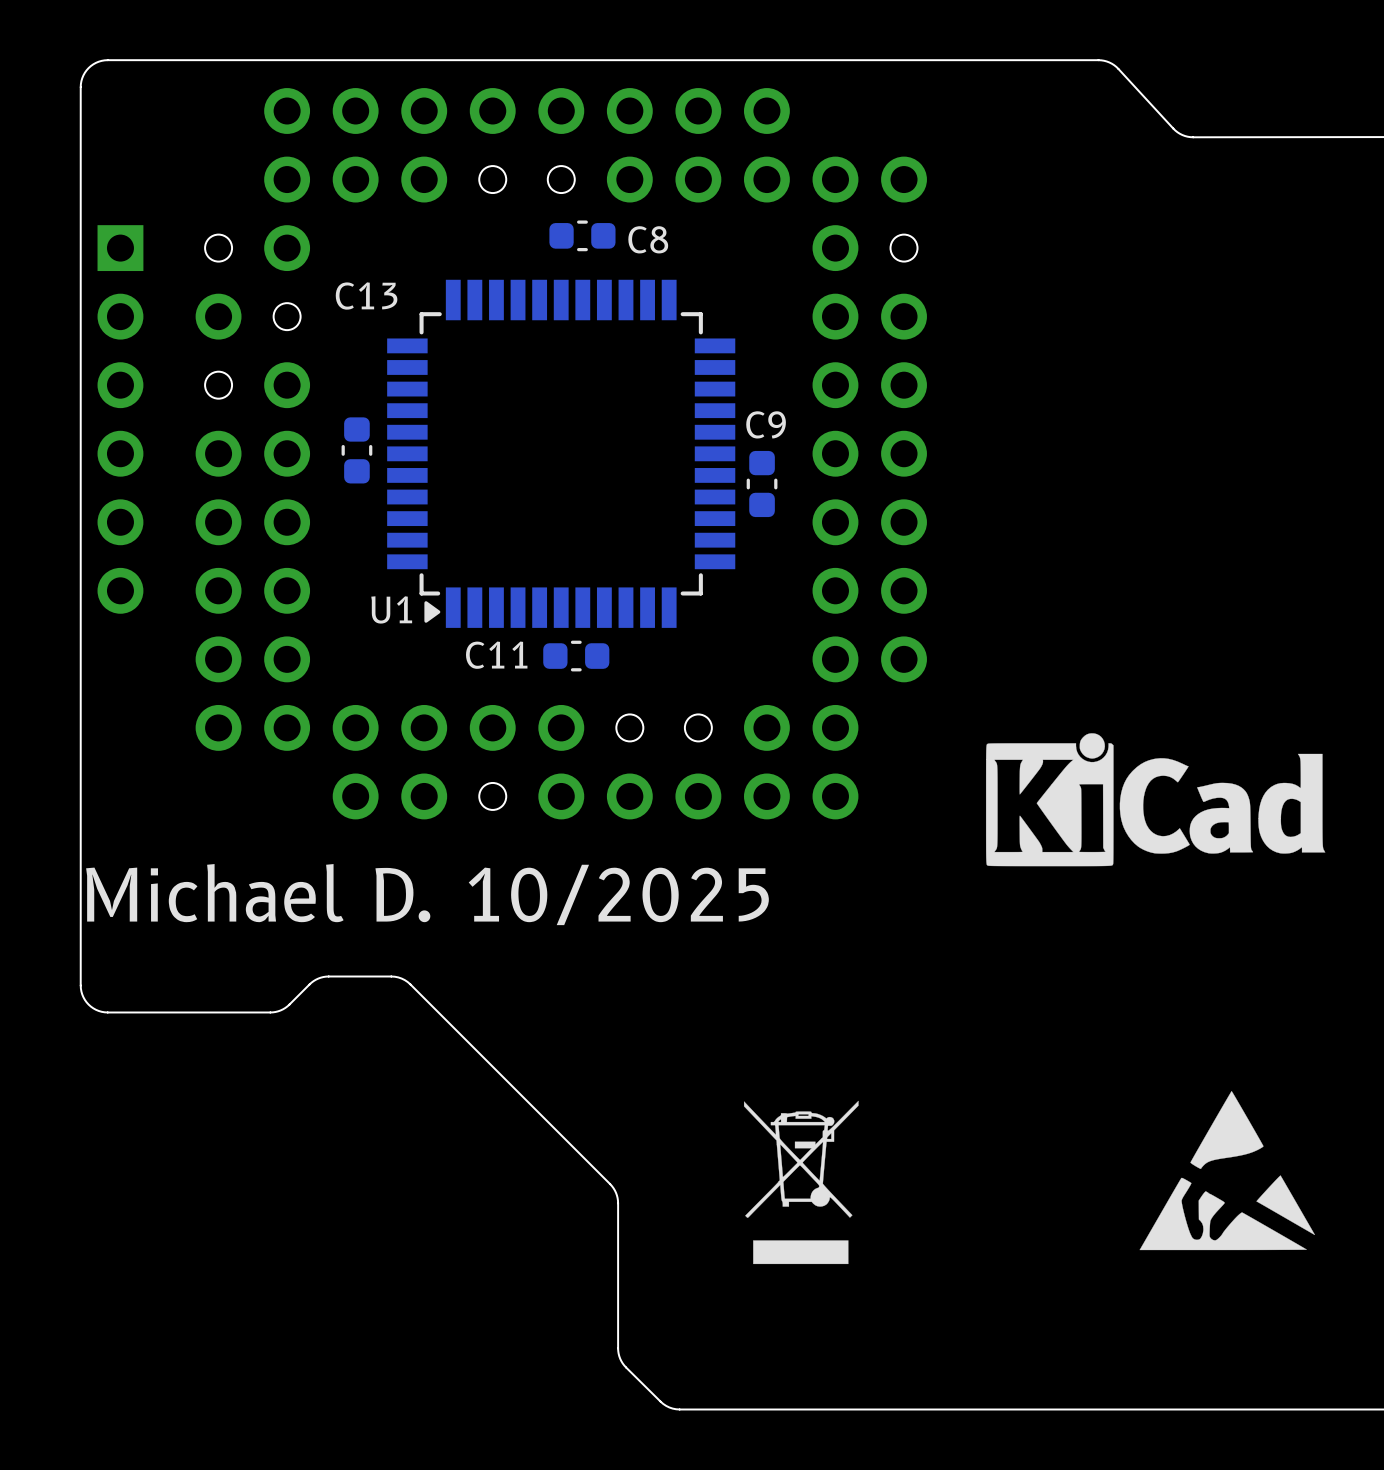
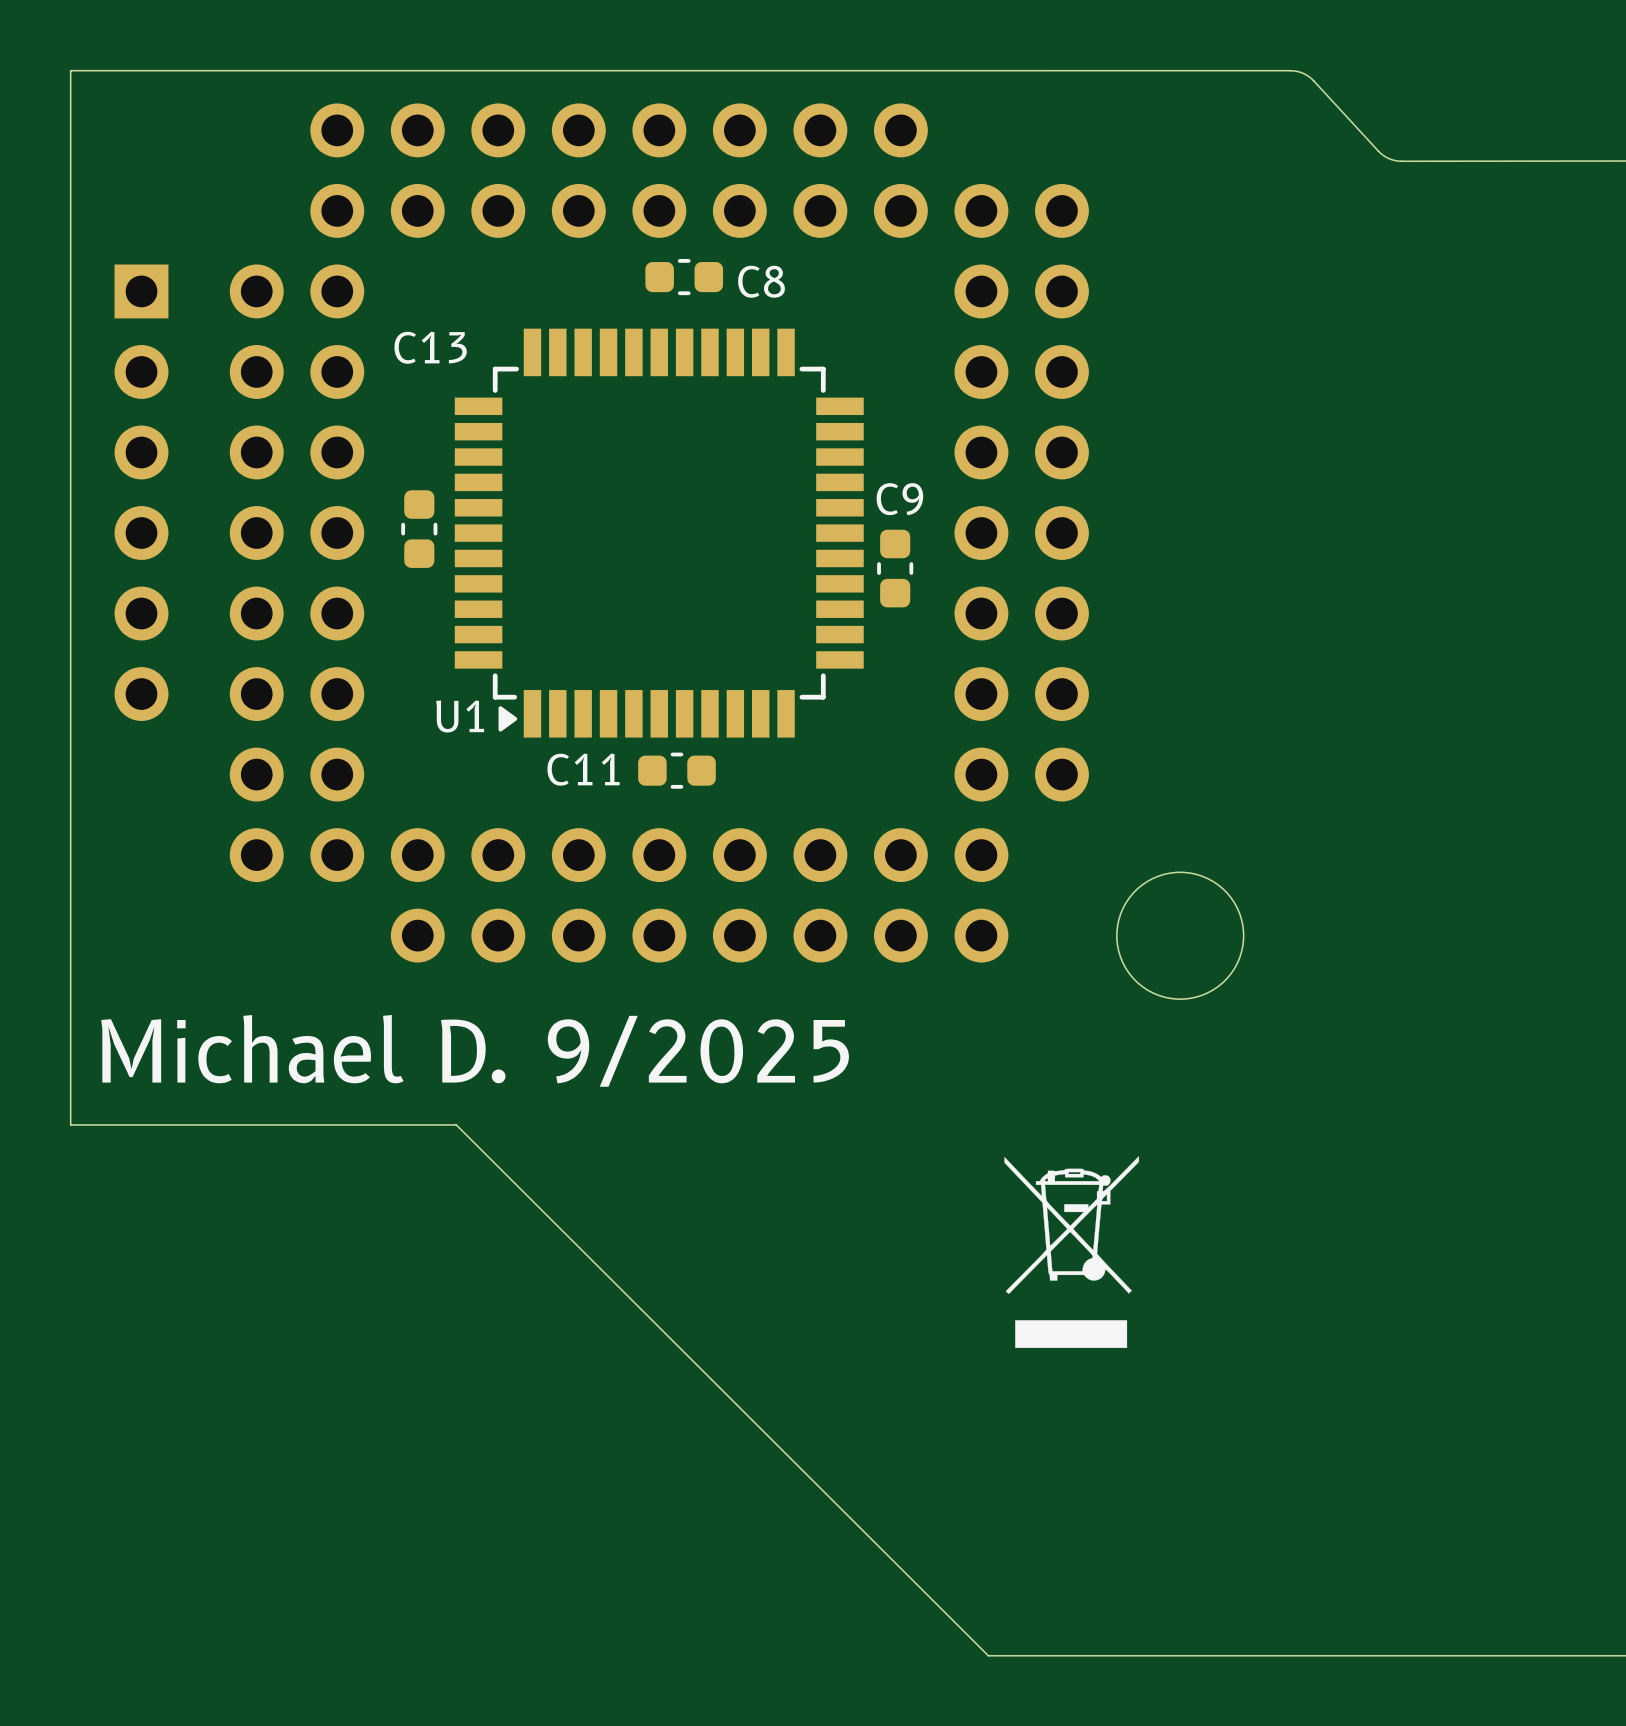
board edge: (107, 60) (98, 61) (88, 68) (83, 75) (80, 87) (80, 985) (83, 997) (90, 1006) (104, 1012) (273, 1012) (285, 1007) (311, 982) (323, 977) (391, 976) (404, 980) (613, 1188) (618, 1203) (618, 1353) (624, 1365) (660, 1401) (669, 1407) (679, 1409) (841, 1409) -> (126, 70) (70, 70) (70, 1124) (456, 1124) (988, 1655)
part footprint: [195, 88, 927, 820] -> [229, 103, 1089, 963]
drawing: [985, 733, 1326, 867] -> none
round board edge: none -> [1116, 871, 1245, 1000]
text: Michael D. 10/2025 (427, 894) -> Michael D. 9/2025 (475, 1050)
drawing: [1139, 1091, 1315, 1251] -> none
drawing position: (801, 1182) -> (1071, 1252)

